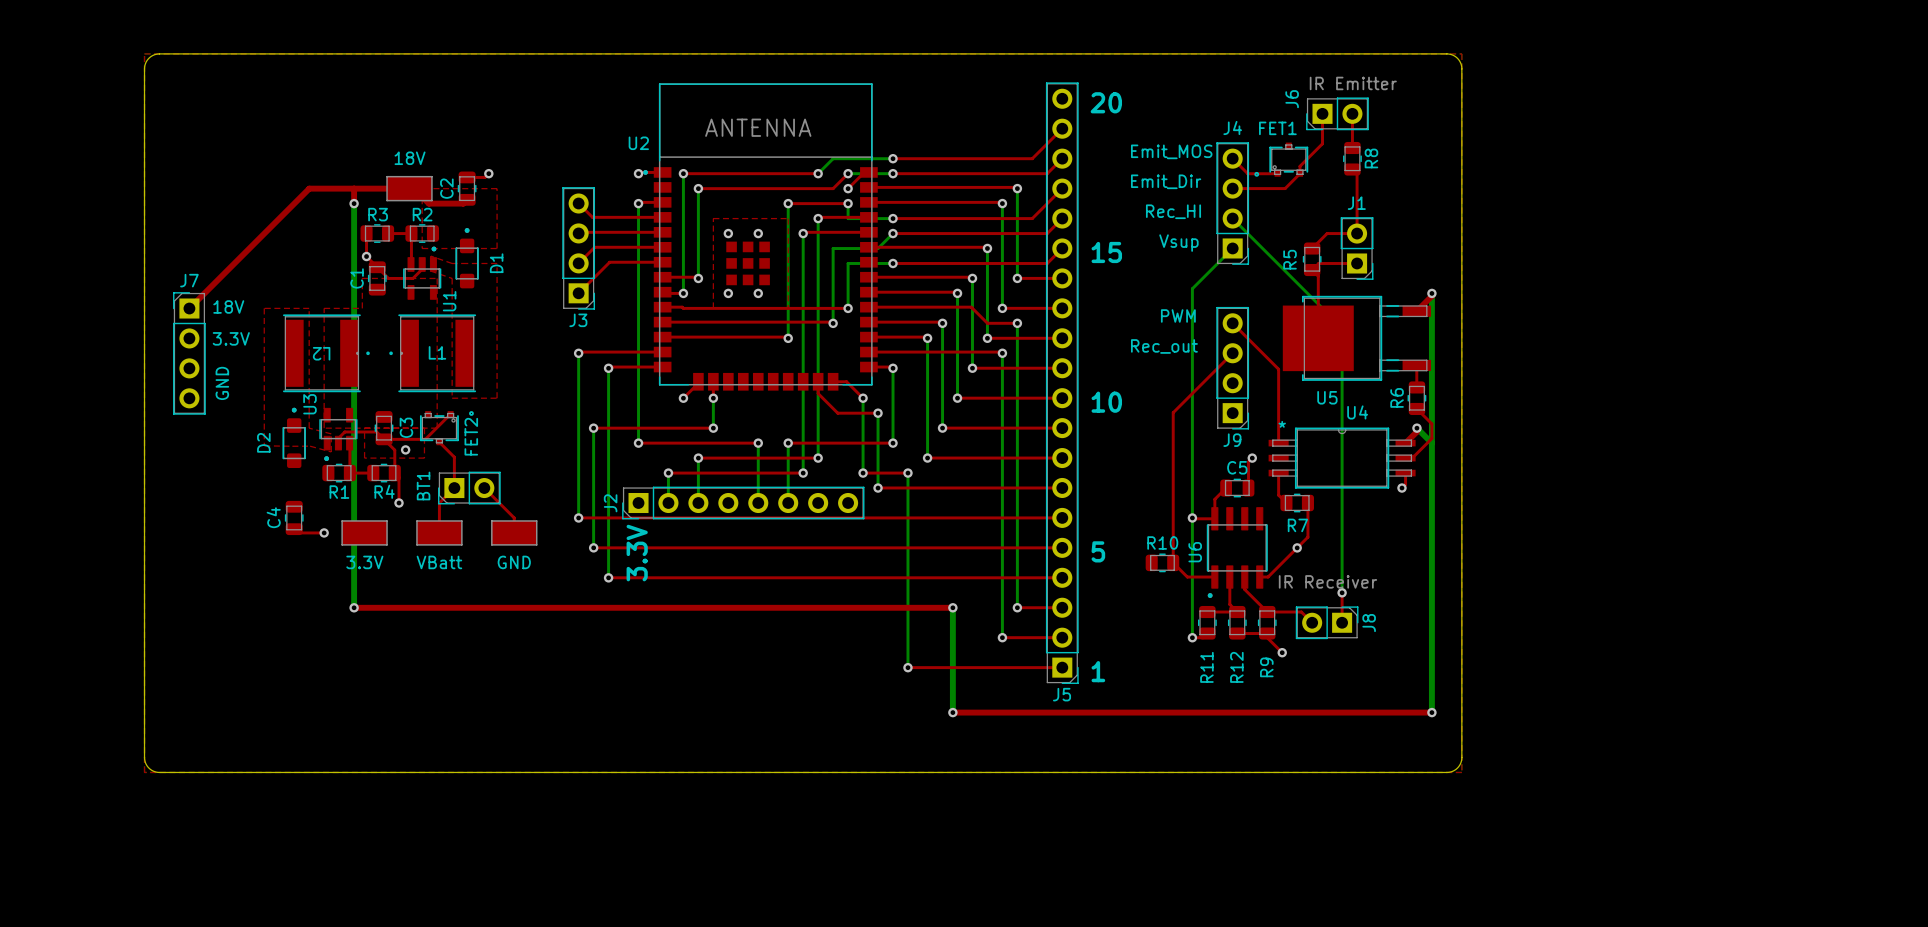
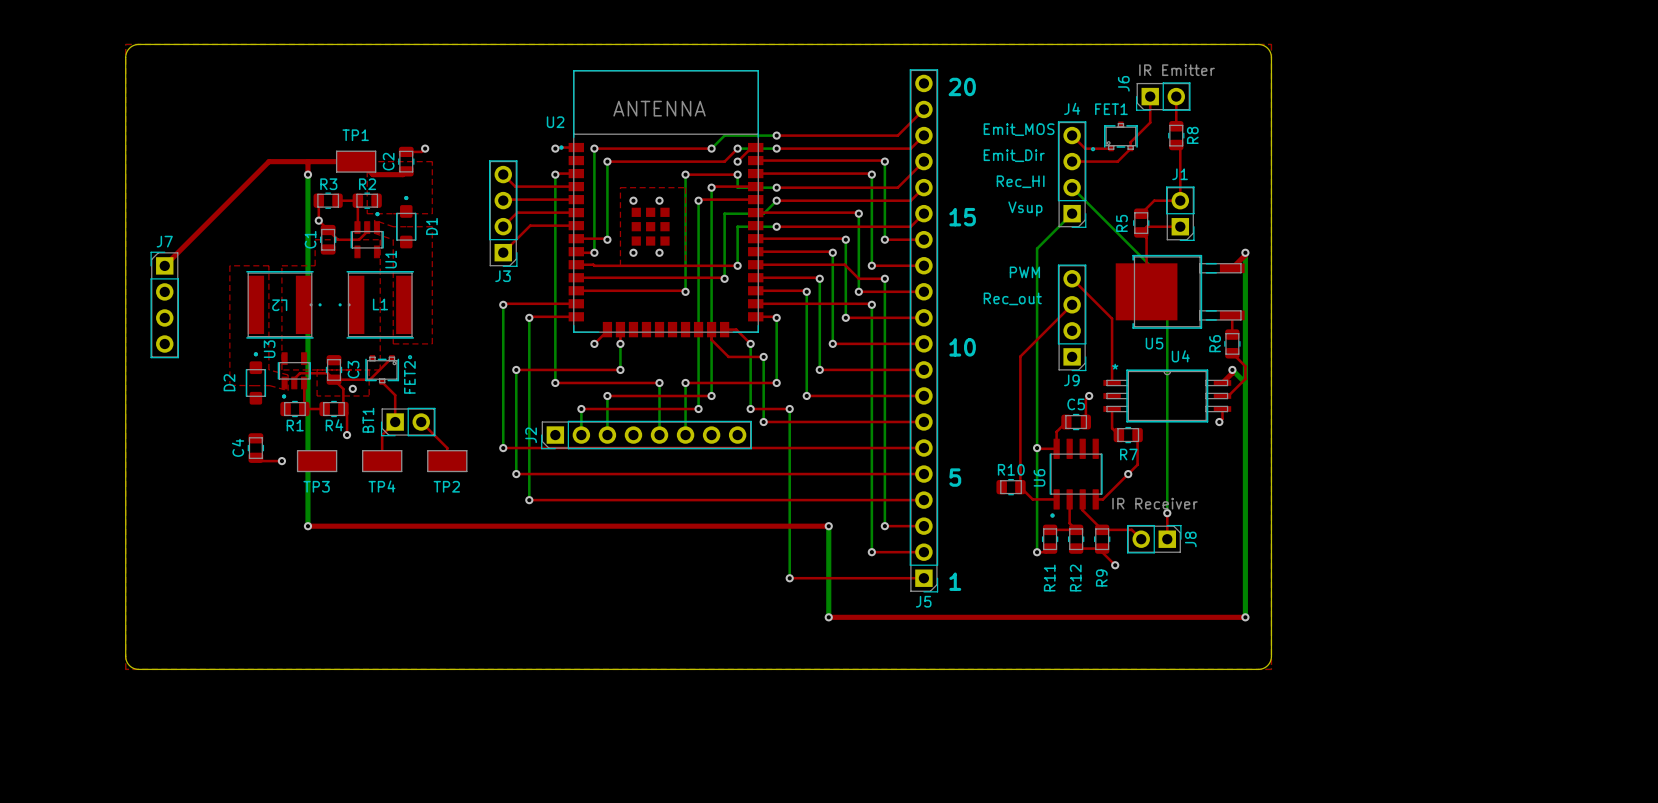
18V name: 18V (410, 158) -> TP1 (355, 135)
text: 18V (228, 306) -> none
text: 3.3V (231, 338) -> none
text: GND (222, 383) -> none
text: 3.3V (637, 553) -> none
3.3V name: 3.3V (364, 562) -> TP3 (316, 486)
VBatt name: VBatt (439, 562) -> TP4 (381, 486)
GND name: GND (514, 562) -> TP2 (446, 486)

